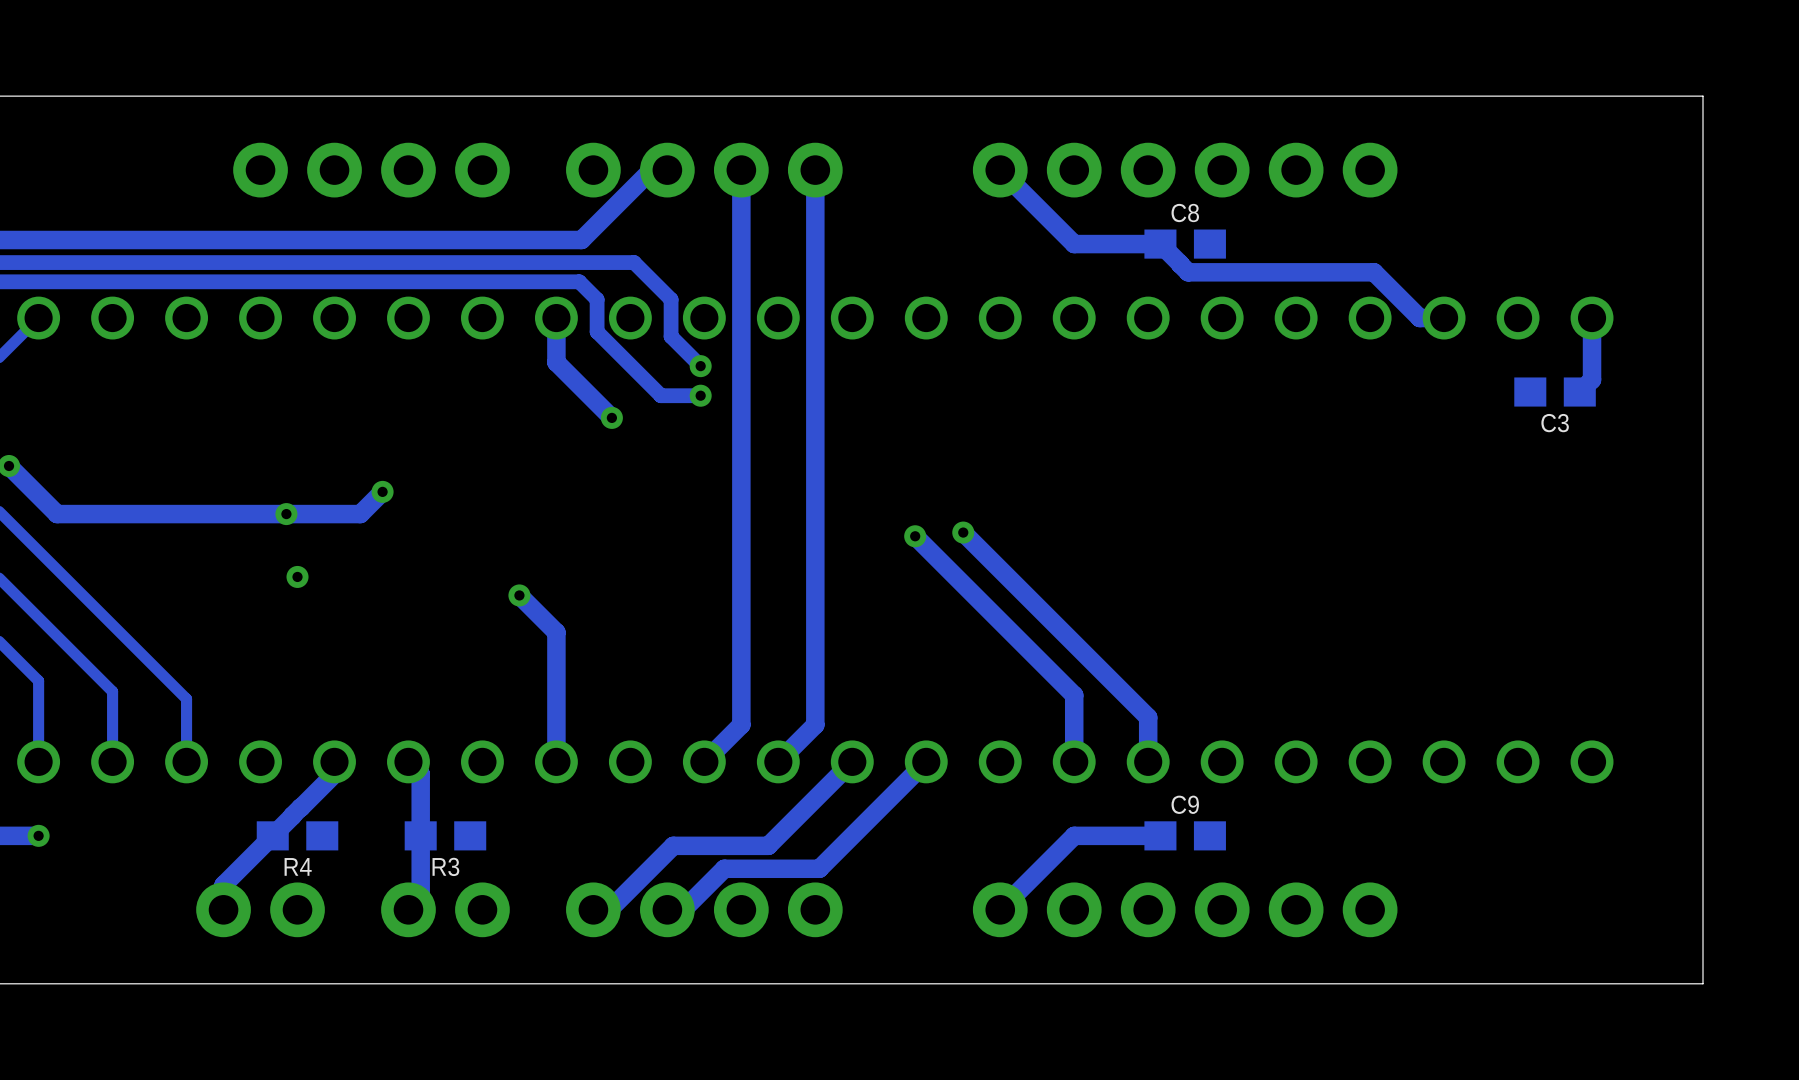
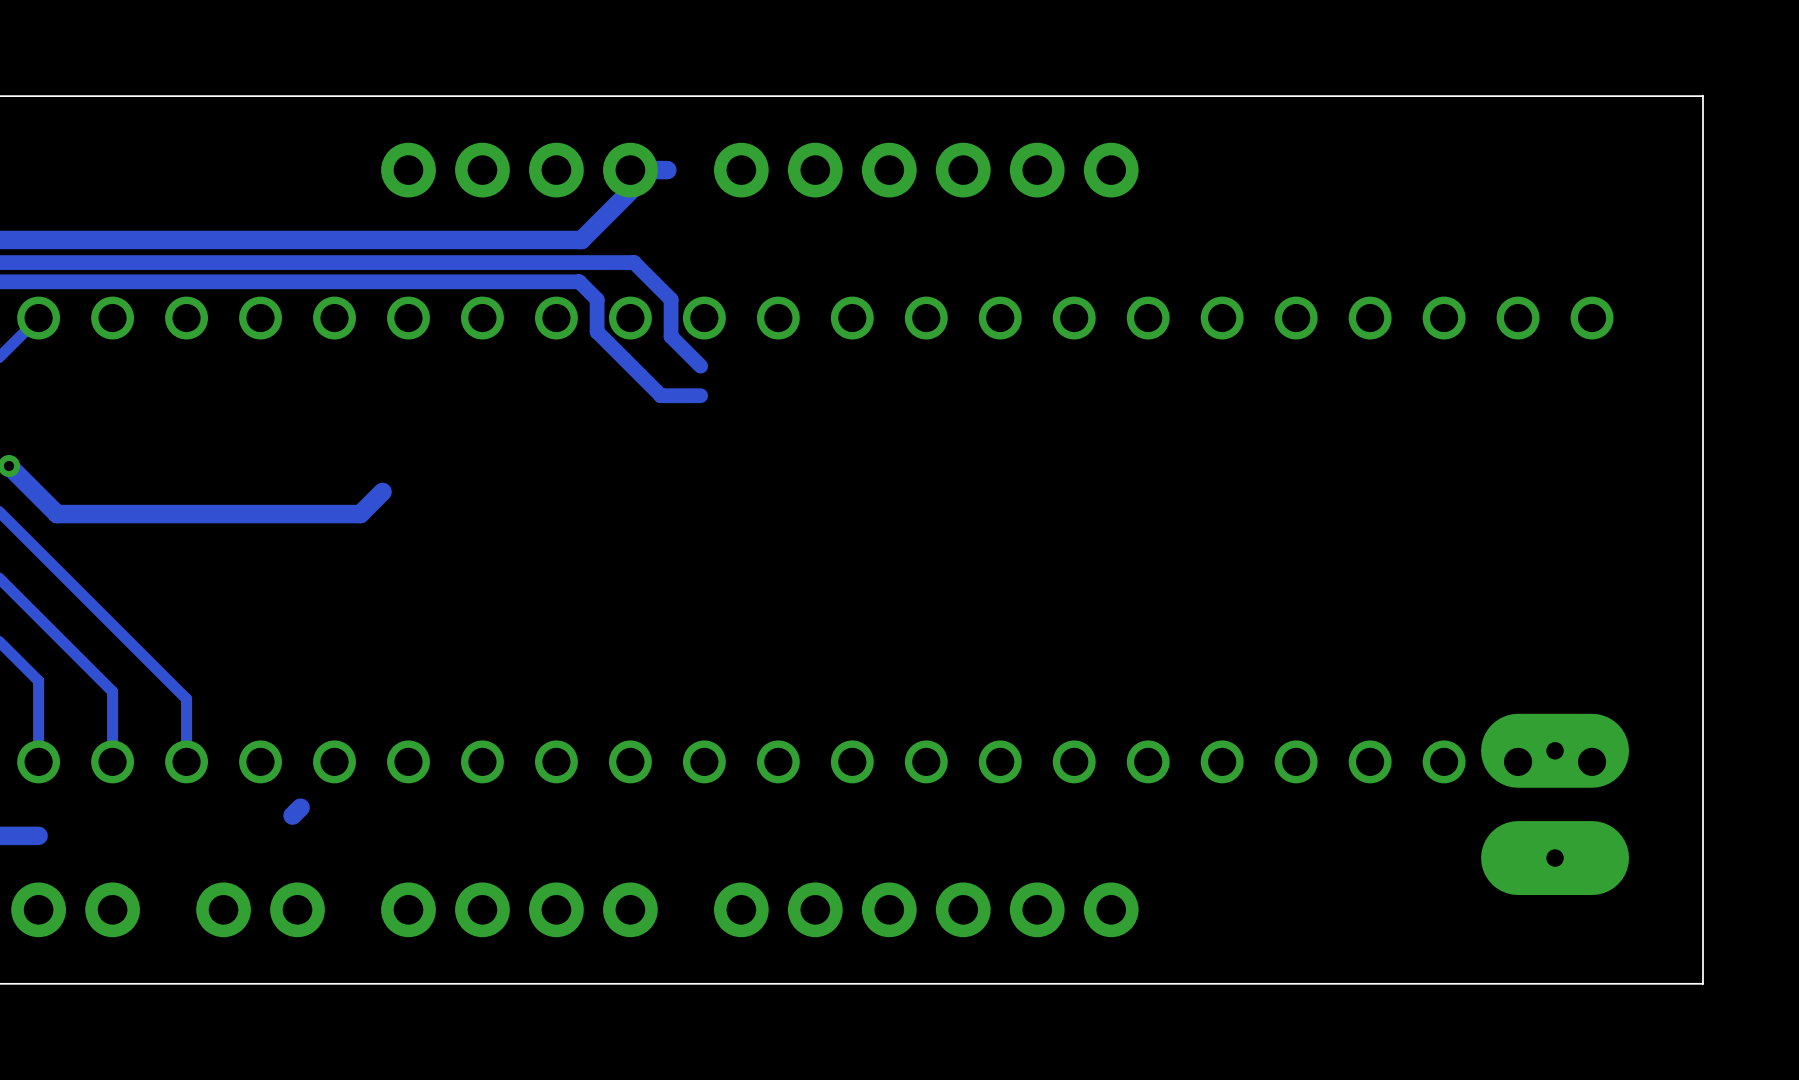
part: (371, 170) -> none
part: none -> (519, 170)
part: (704, 170) -> none
track: (741, 170) (741, 724) (704, 761) -> none
track: (815, 170) (815, 724) (778, 761) -> none
track: (1000, 170) (1074, 244) (1160, 244) (1180, 263) -> none
part position: (1185, 170) -> (926, 170)
C8: (1185, 244) -> none
track: (1180, 264) (1188, 272) (1374, 272) (1419, 318) (1444, 318) -> none
track: (556, 318) (556, 362) (611, 417) -> none
track: (1592, 318) (1592, 379) (1579, 392) -> none
via: (700, 366) -> none
C3: (1555, 392) -> none
via: (700, 395) -> none
via: (611, 417) -> none
via: (382, 491) -> none
via: (286, 514) -> none
track: (963, 532) (1148, 717) (1148, 761) -> none
via: (963, 532) -> none
track: (915, 536) (1074, 695) (1074, 761) -> none
via: (915, 536) -> none
via: (297, 576) -> none
track: (519, 595) (556, 632) (556, 761) -> none
via: (519, 595) -> none
part: none -> (1555, 750)
track: (334, 761) (334, 774) (301, 807) -> none
track: (408, 761) (420, 774) (420, 897) (408, 909) -> none
track: (852, 761) (768, 845) (673, 845) (609, 909) (593, 909) -> none
track: (926, 761) (819, 868) (724, 868) (683, 909) (667, 909) -> none
track: (292, 816) (223, 885) (223, 909) -> none
via: (38, 835) -> none
R4: (297, 835) -> none
R3: (445, 835) -> none
track: (1160, 835) (1074, 835) (1000, 909) -> none
C9: (1185, 835) -> none
part: none -> (1555, 858)
part position: (445, 909) -> (75, 909)
part position: (704, 909) -> (519, 909)
part position: (1185, 909) -> (926, 909)

